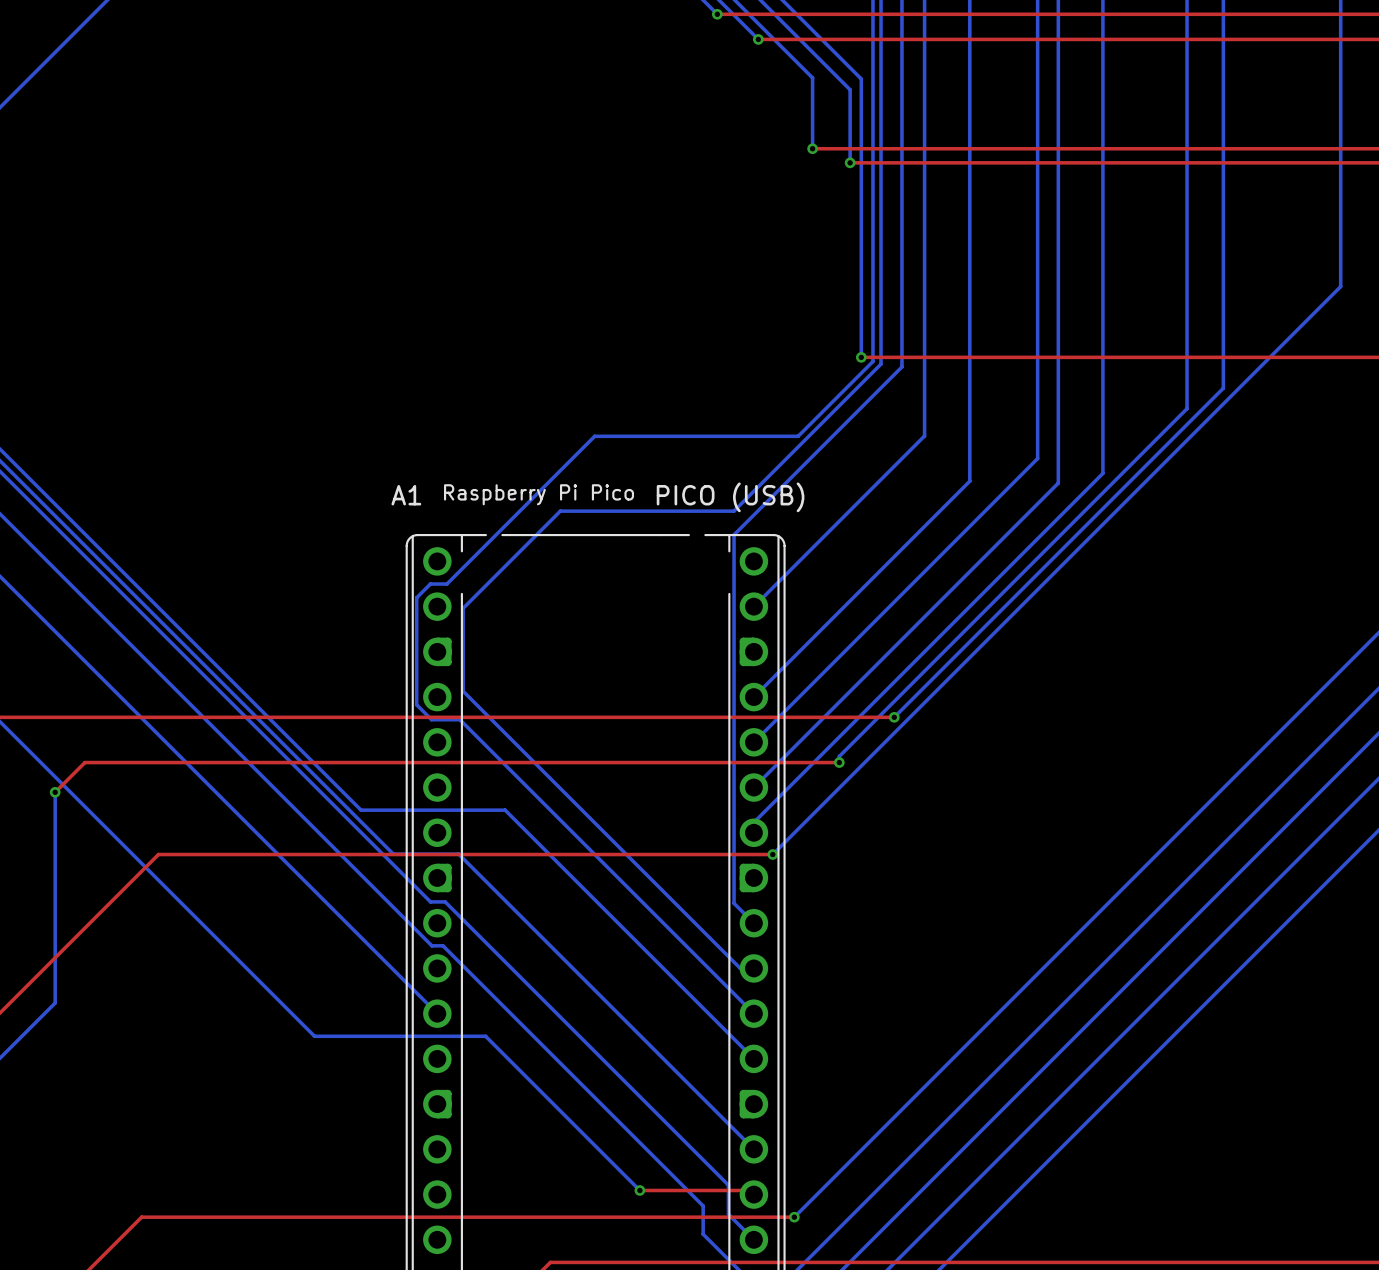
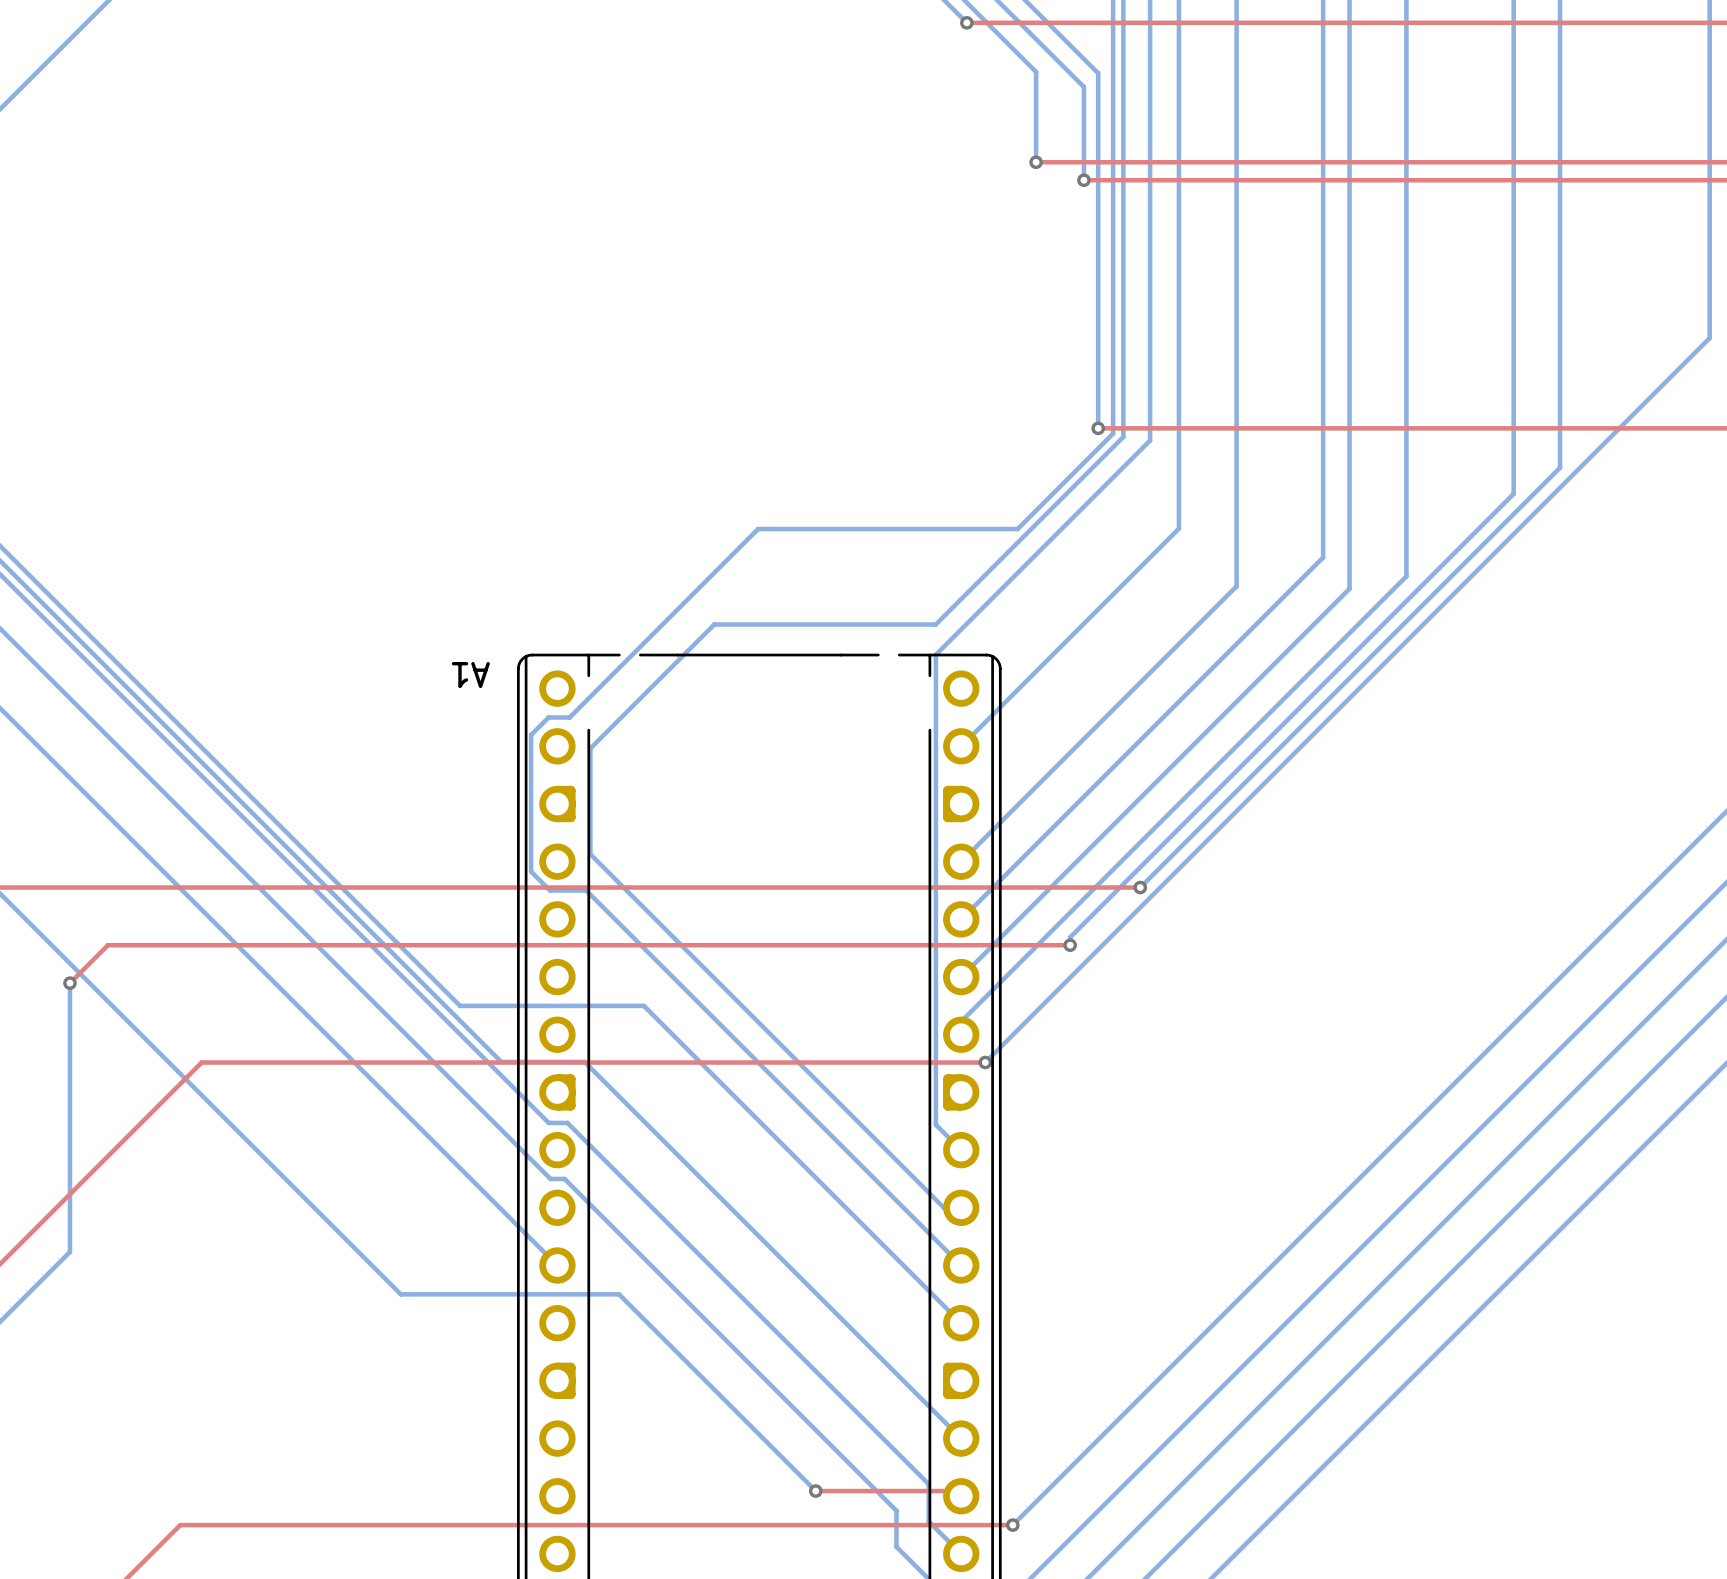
text: Raspberry Pi Pico (539, 494) -> none
A1 name rotation: 0° (406, 495) -> 180° (470, 675)
A1 name position: A1 (406, 495) -> A1 (470, 675)
text: PICO (USB) (730, 497) -> none

